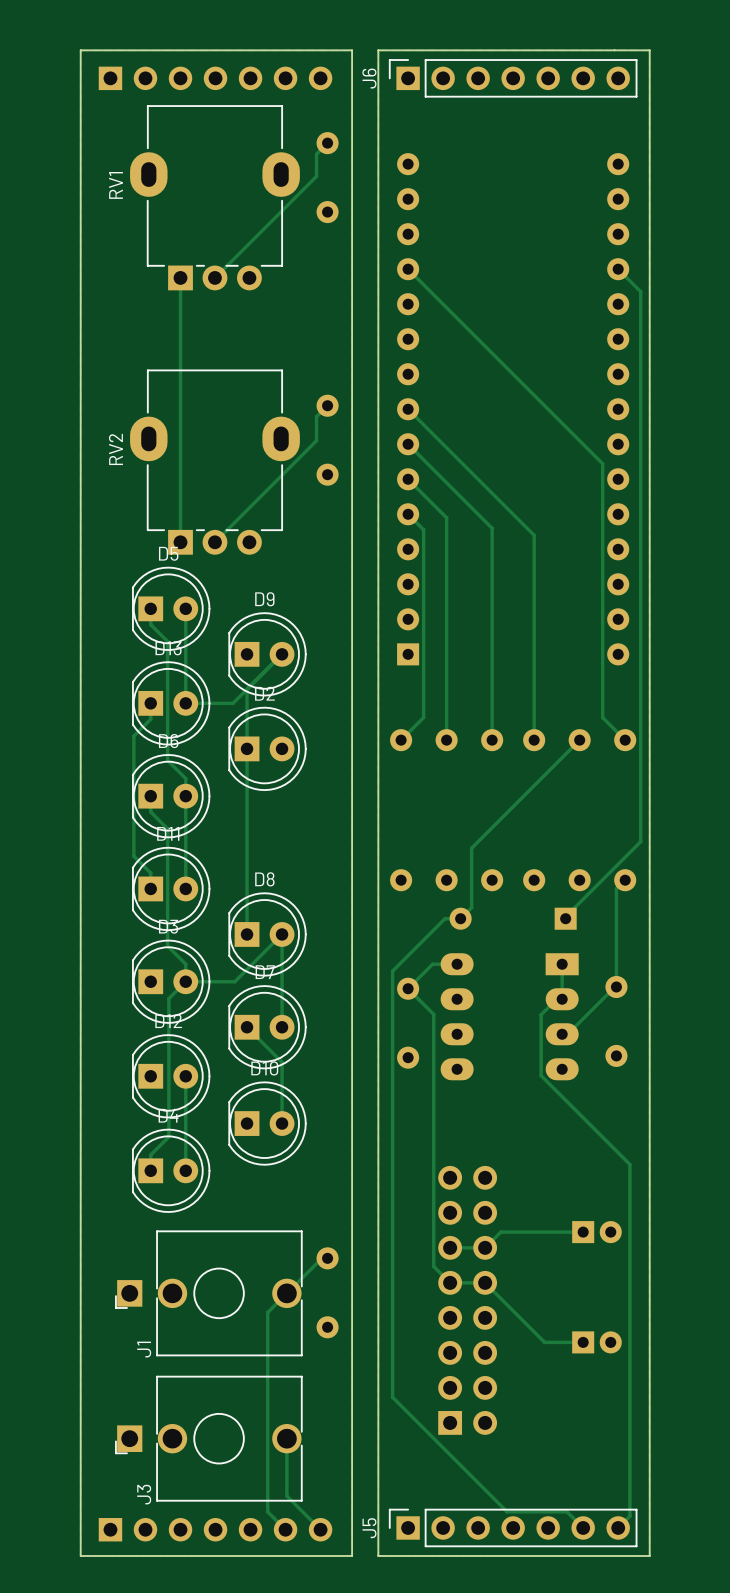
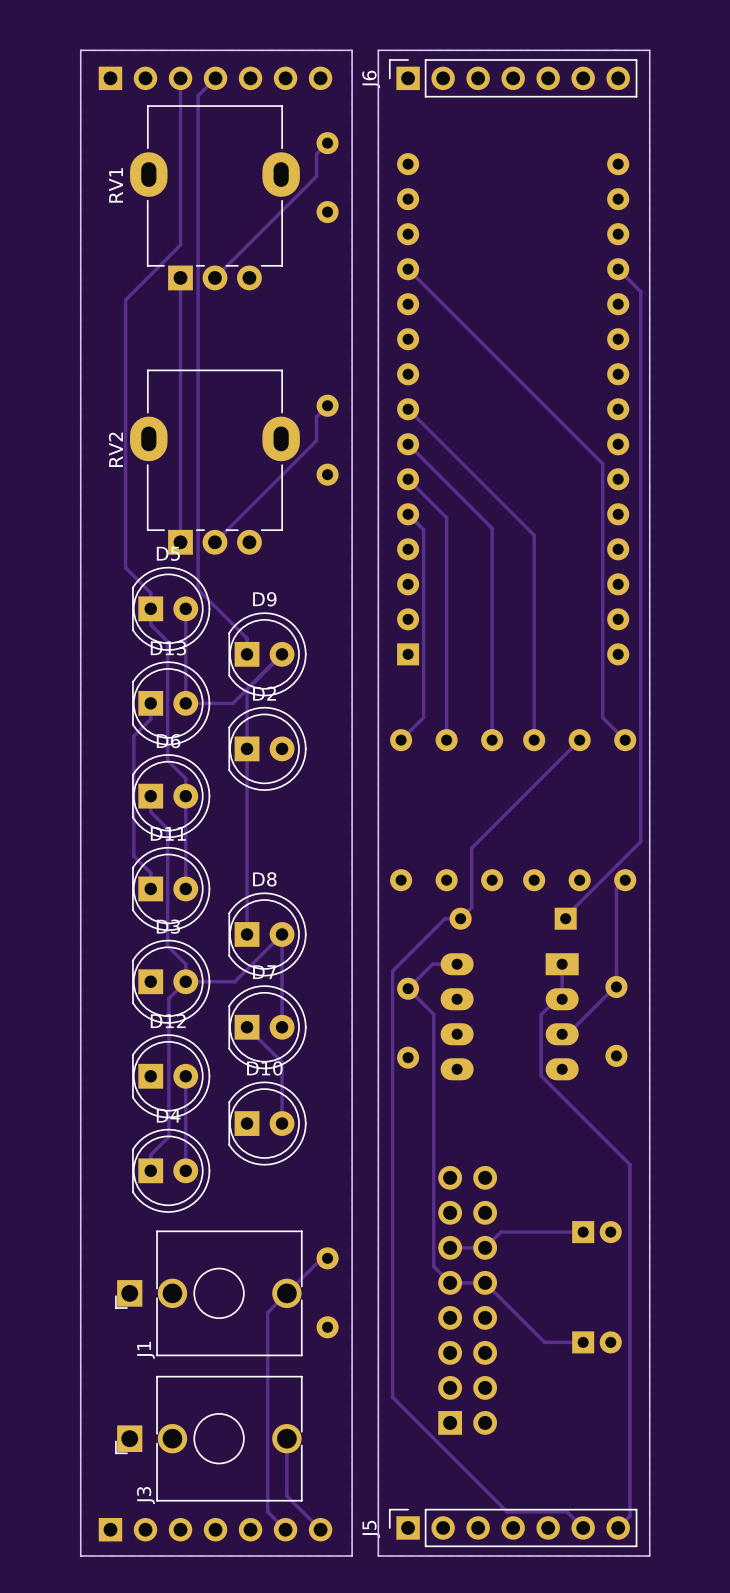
track: none -> (180, 78) (180, 245) (125, 299) (125, 567) (150, 592) (150, 608)
track: none -> (215, 78) (198, 95) (198, 589) (247, 638) (247, 654)

